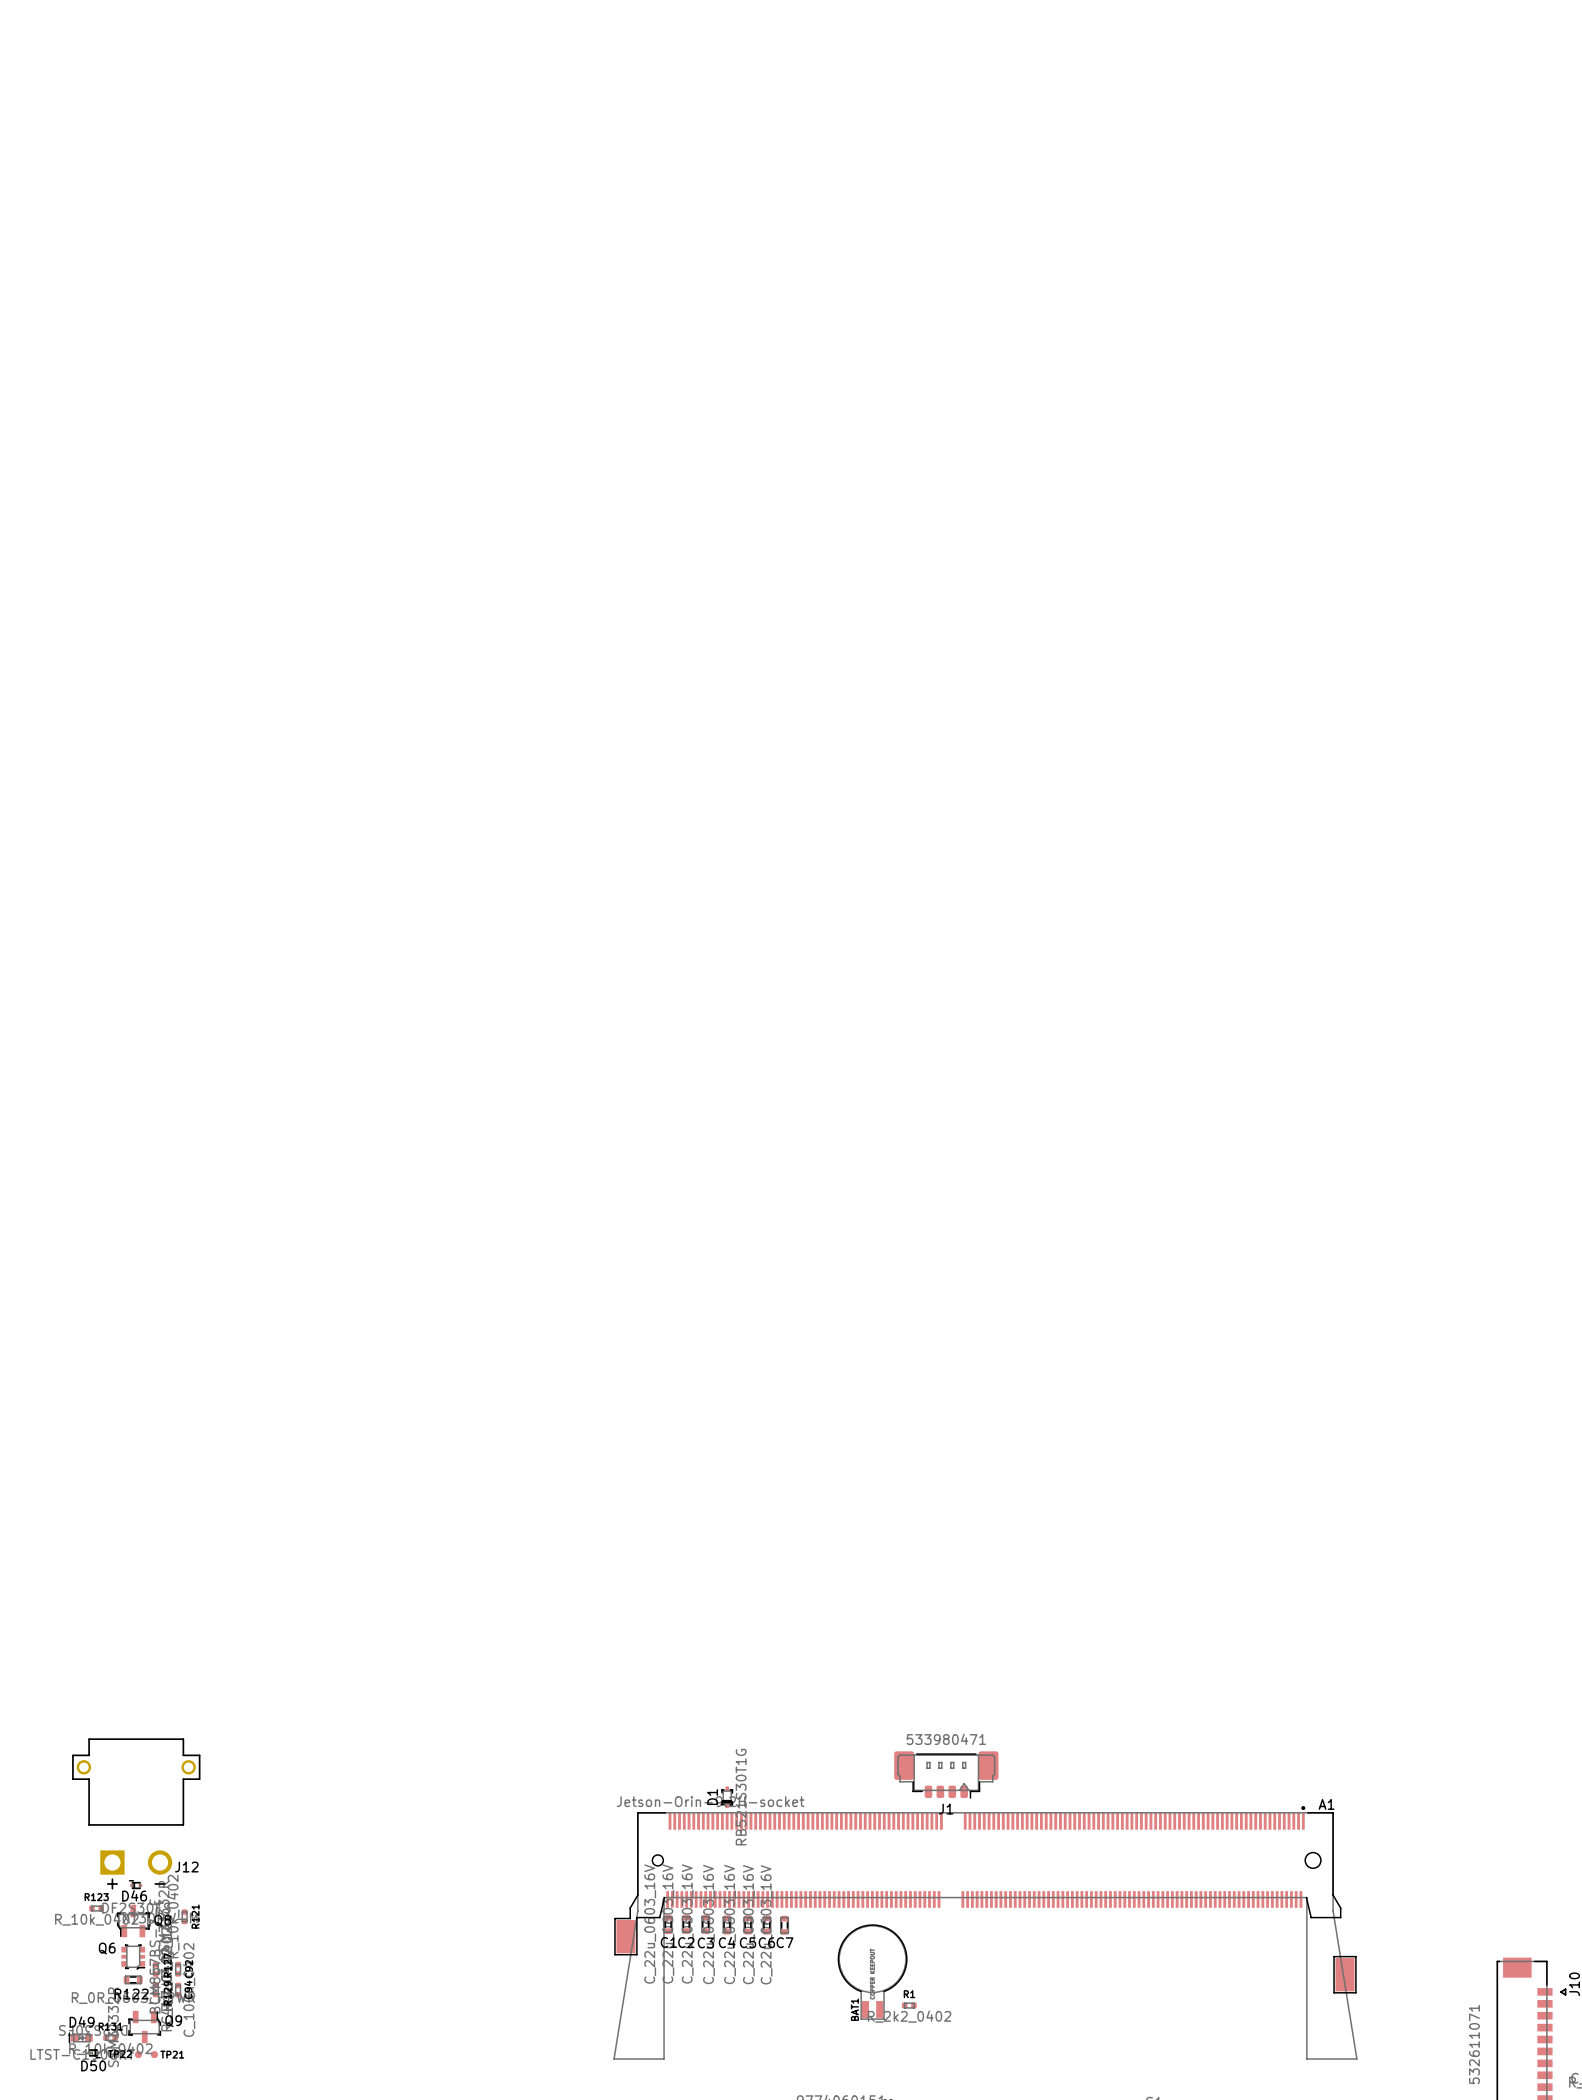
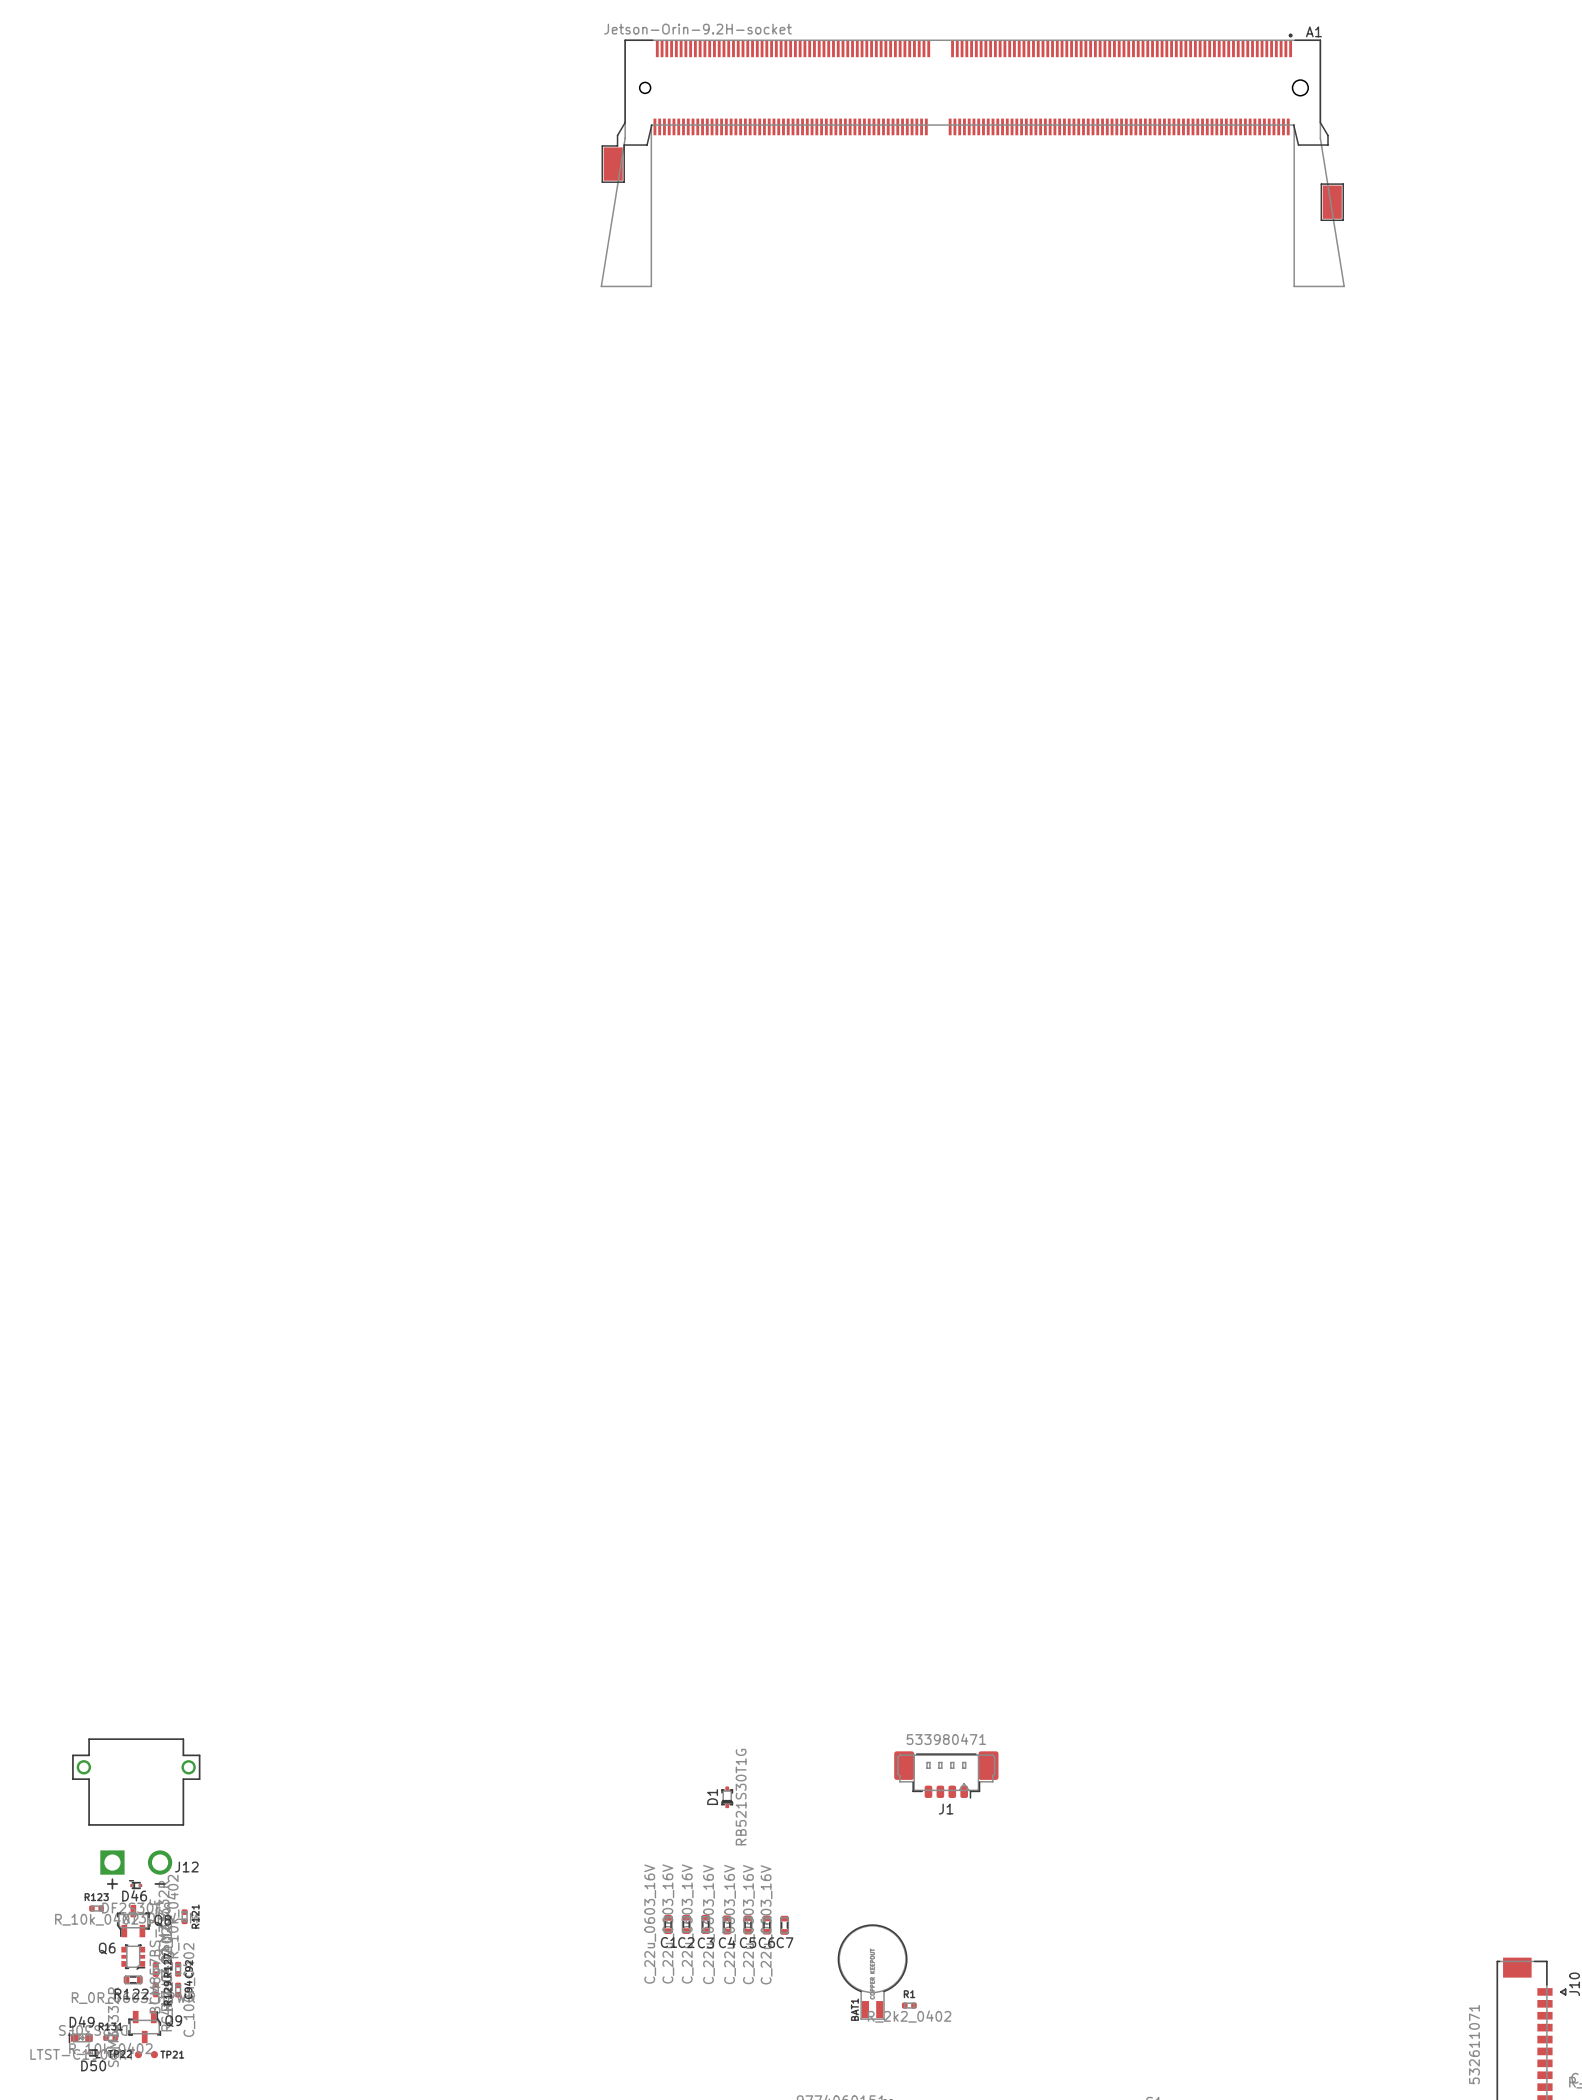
A1 position: (985, 1932) -> (972, 160)

